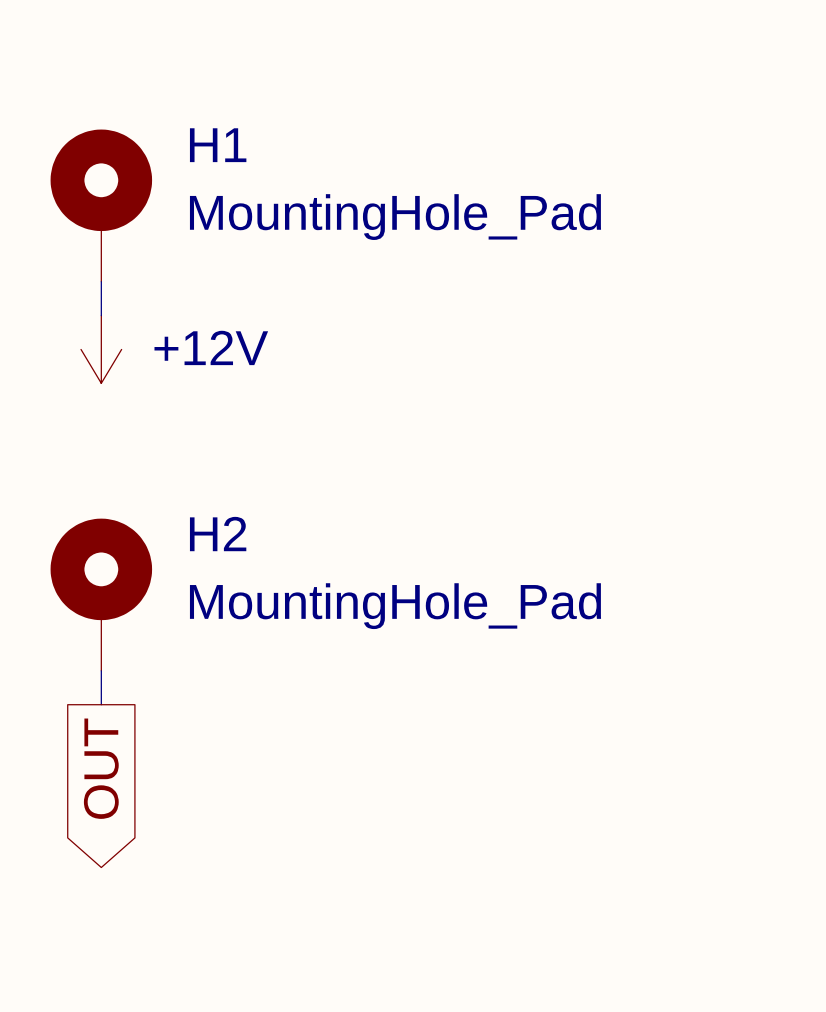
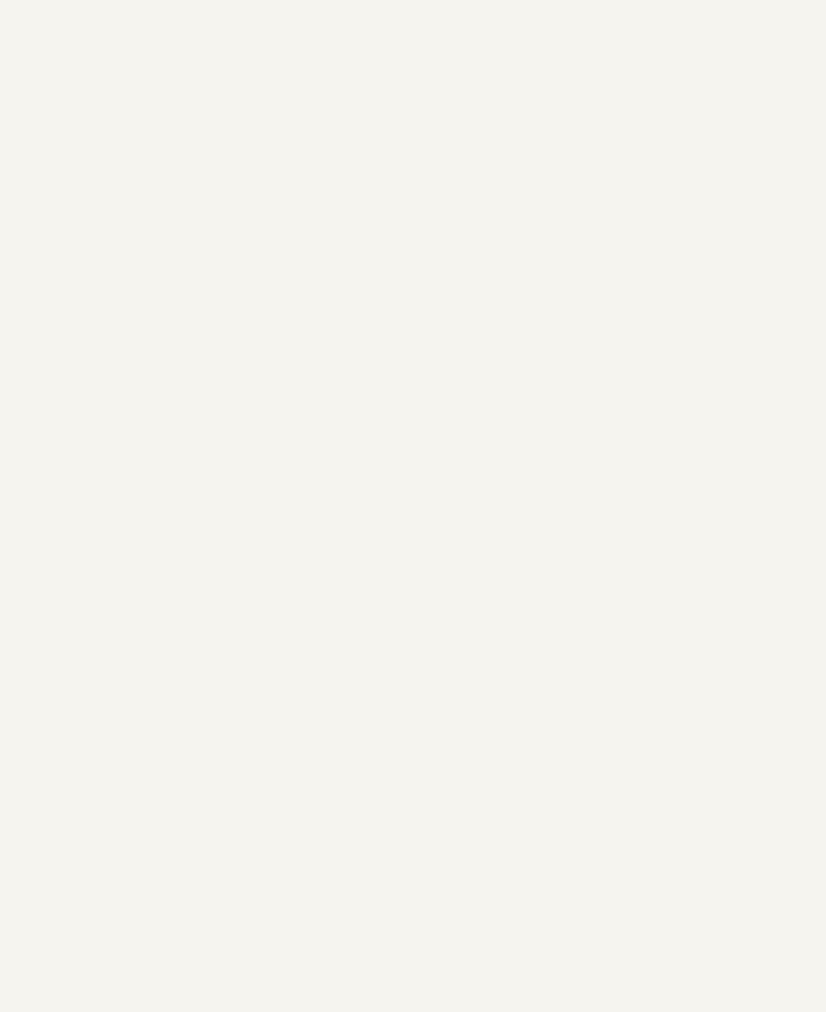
H1: MountingHole_Pad (101, 205) -> none
wire: (101, 281) (101, 315) -> none
power symbol: +12V (101, 349) -> none
H2: MountingHole_Pad (101, 594) -> none
wire: (101, 670) (101, 704) -> none
global label: OUT (101, 768) -> none

